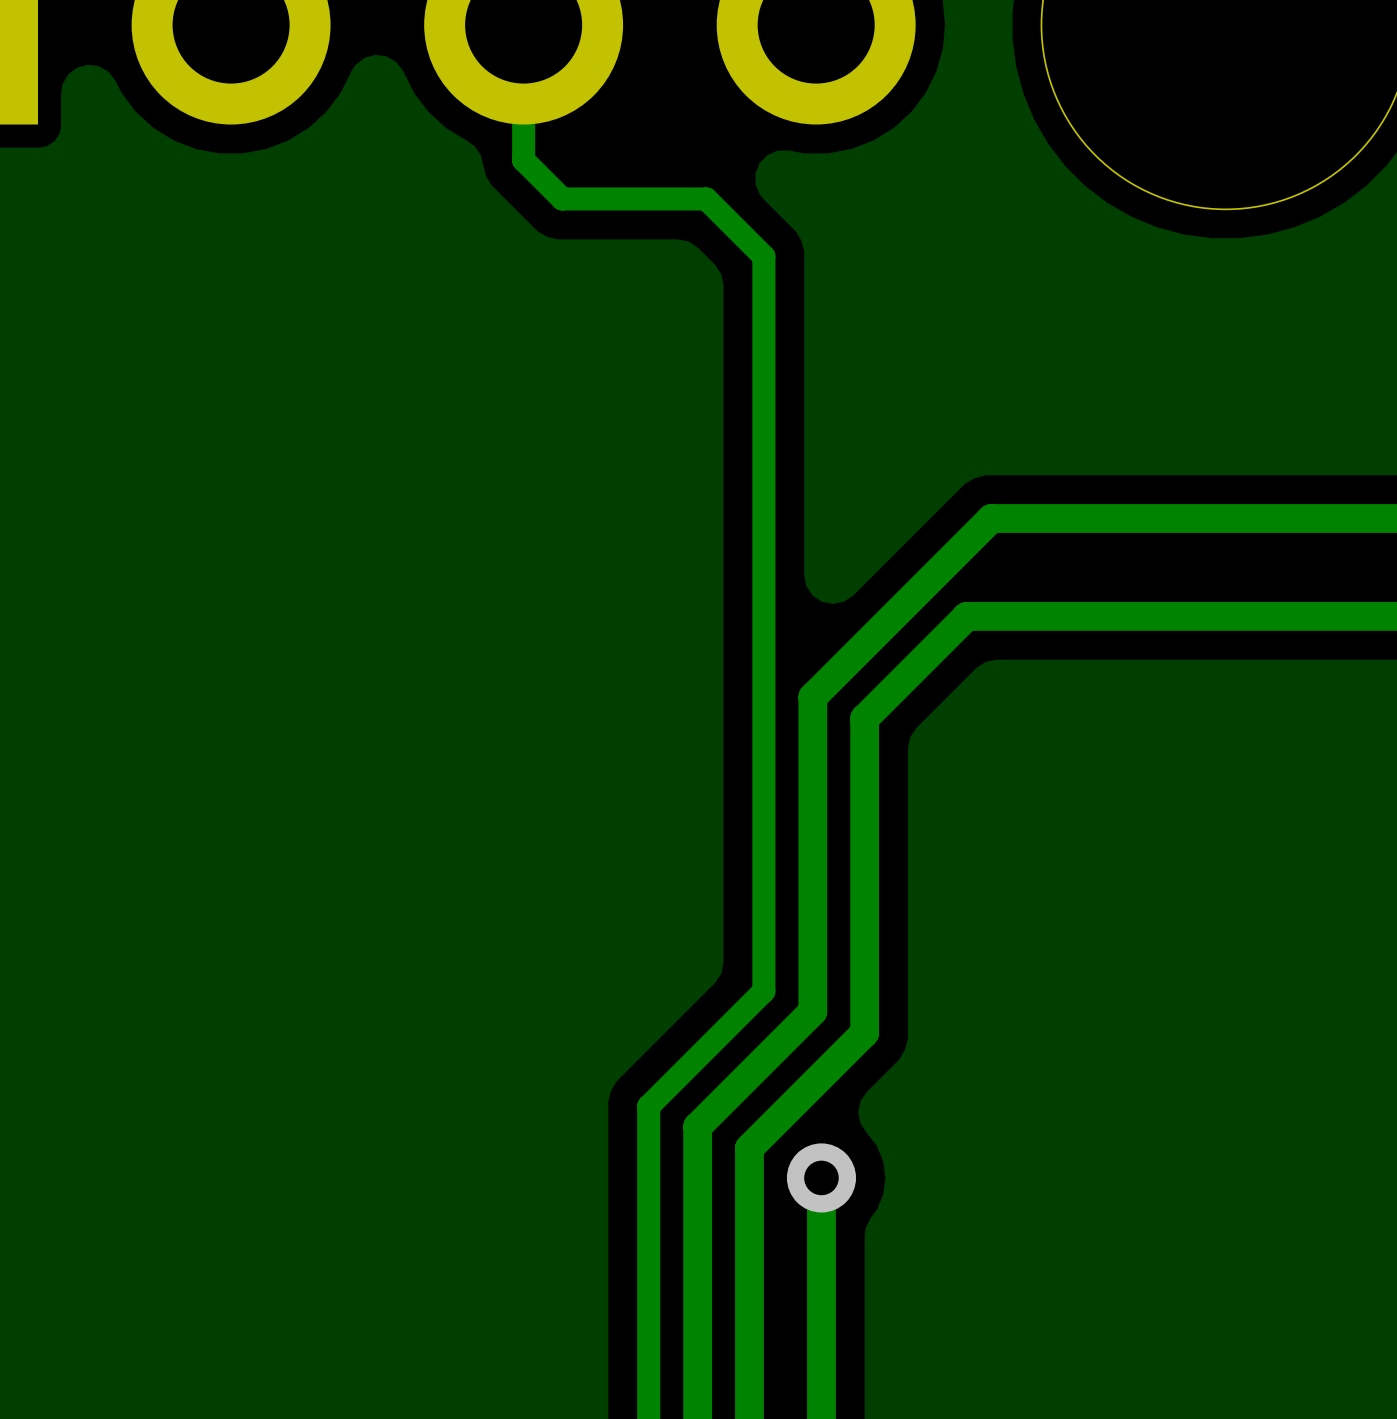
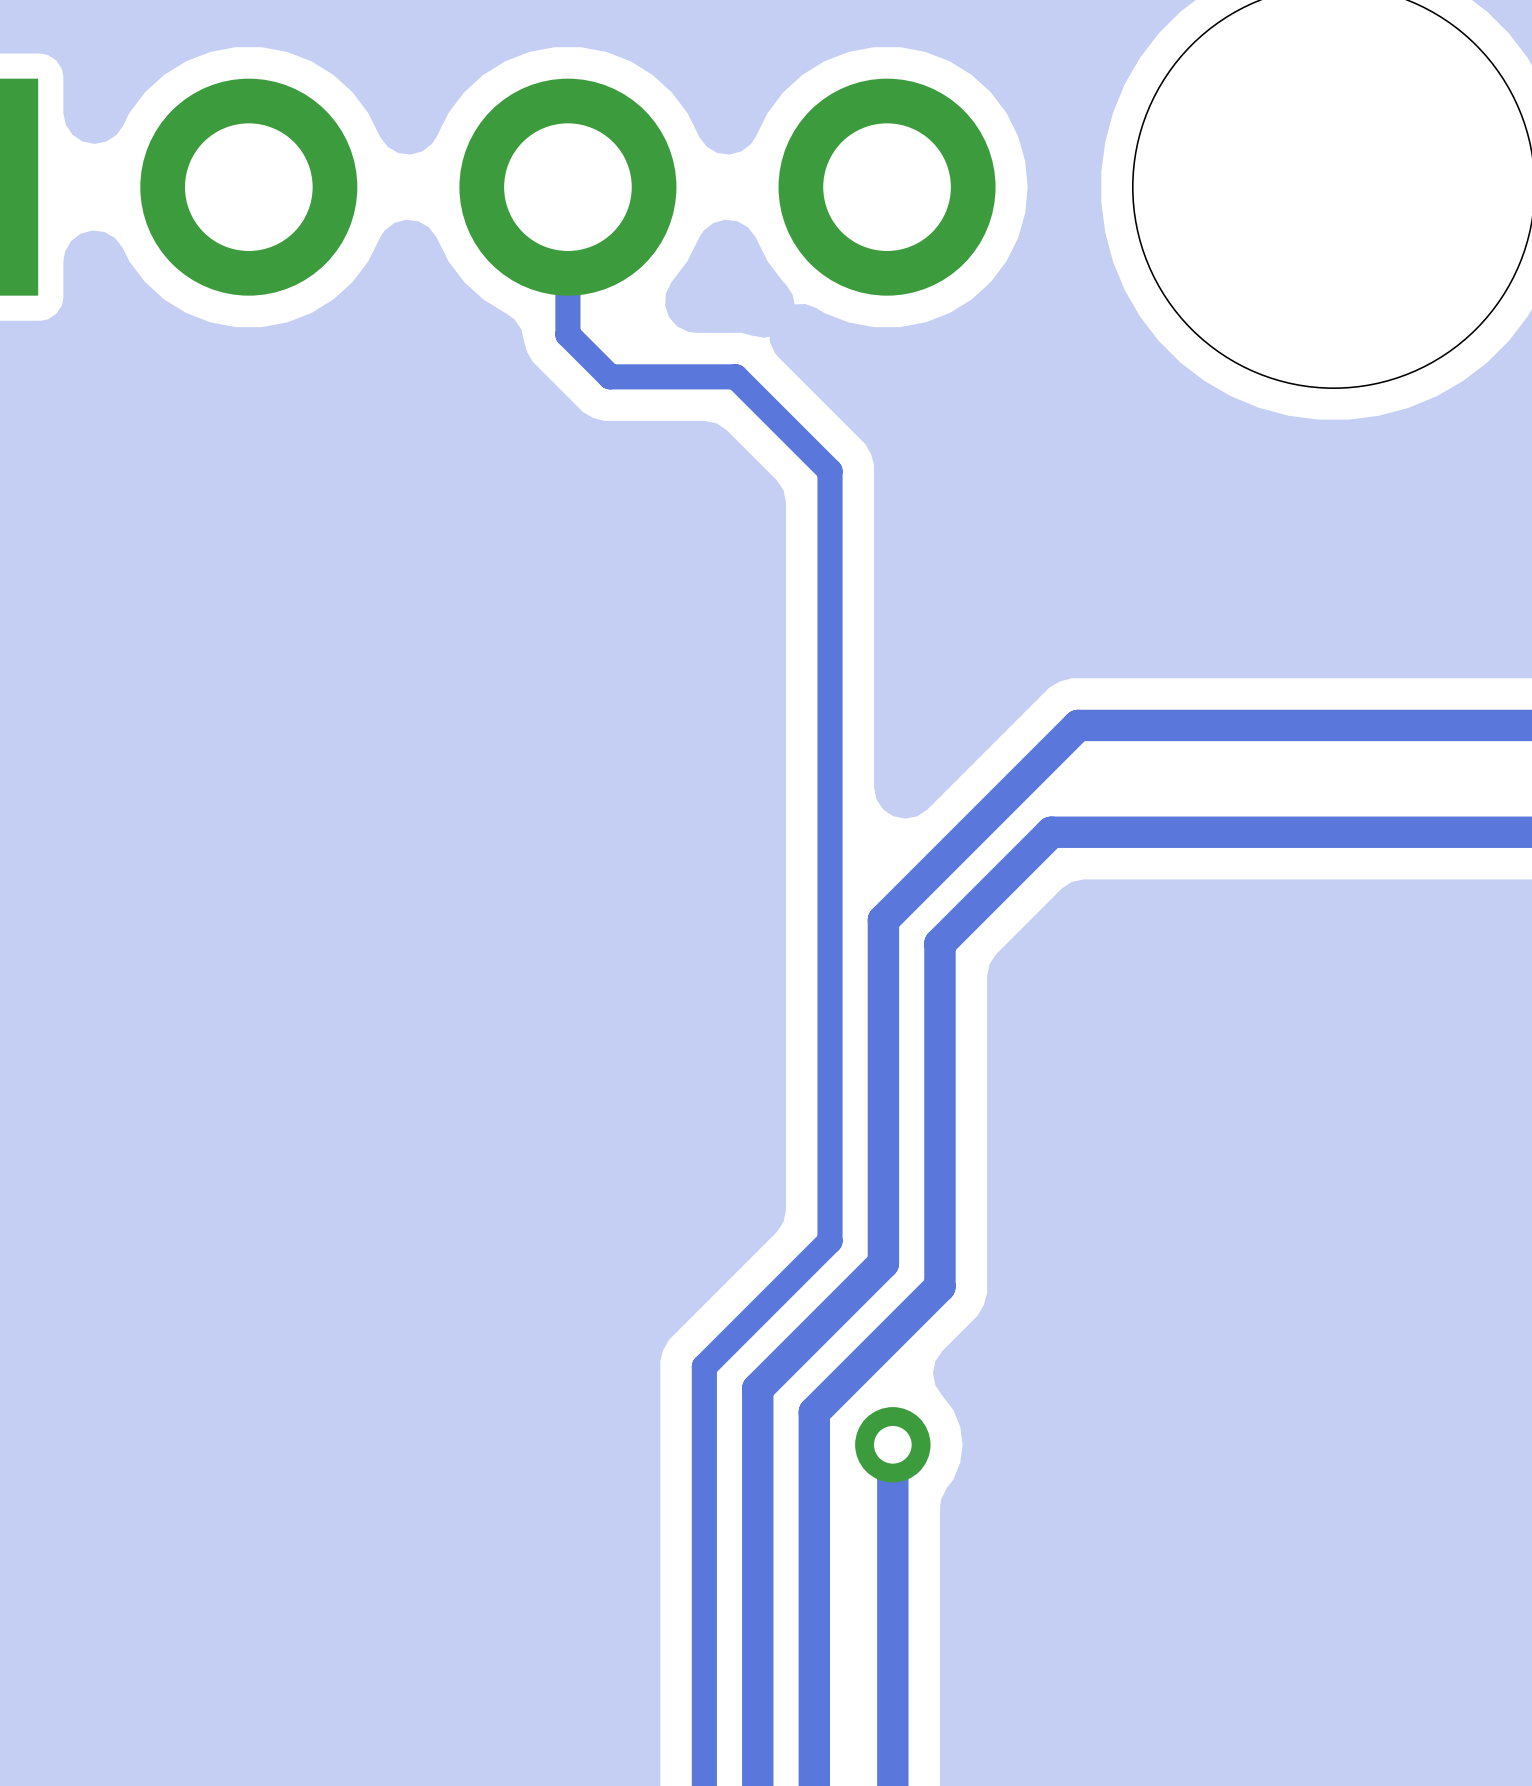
track: (677, 198) (706, 198) (763, 256) (763, 285) -> (735, 376) (830, 471)

